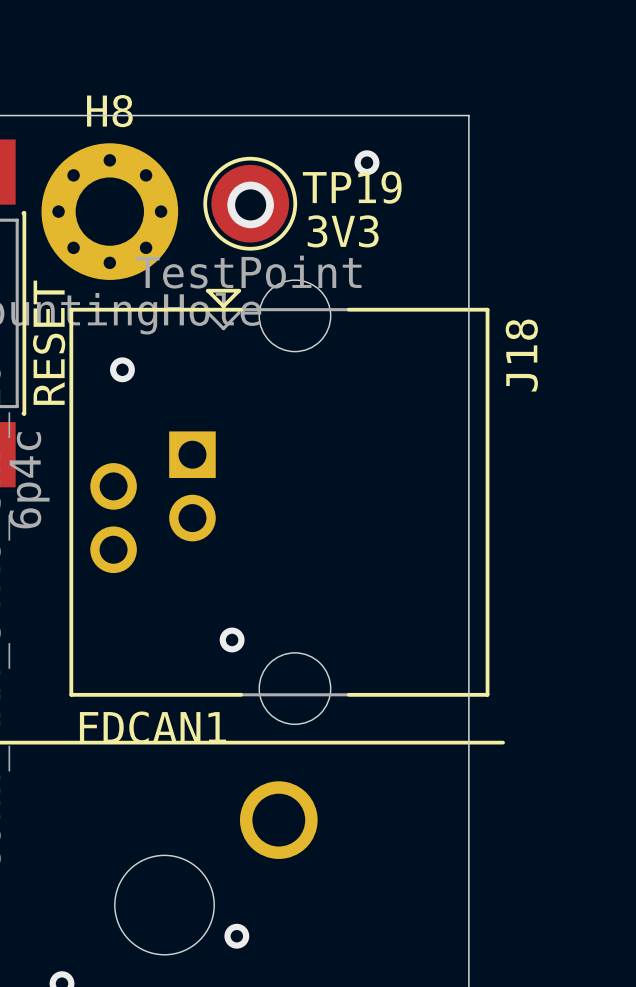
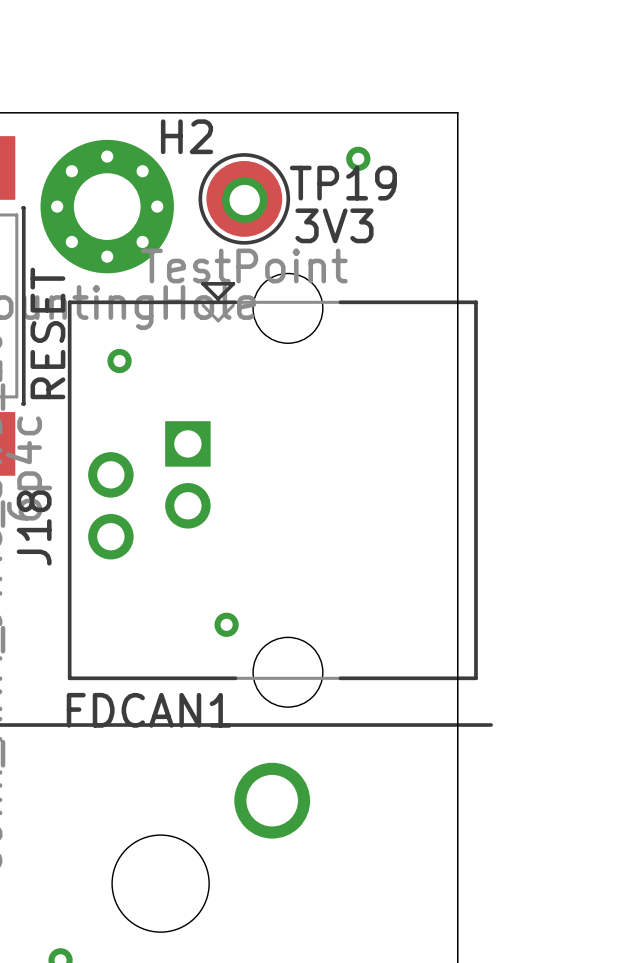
H8 name: H8 (109, 111) -> H2 (187, 136)
J18 name position: J18 (521, 355) -> J18 (34, 527)
via: (236, 936) -> none

